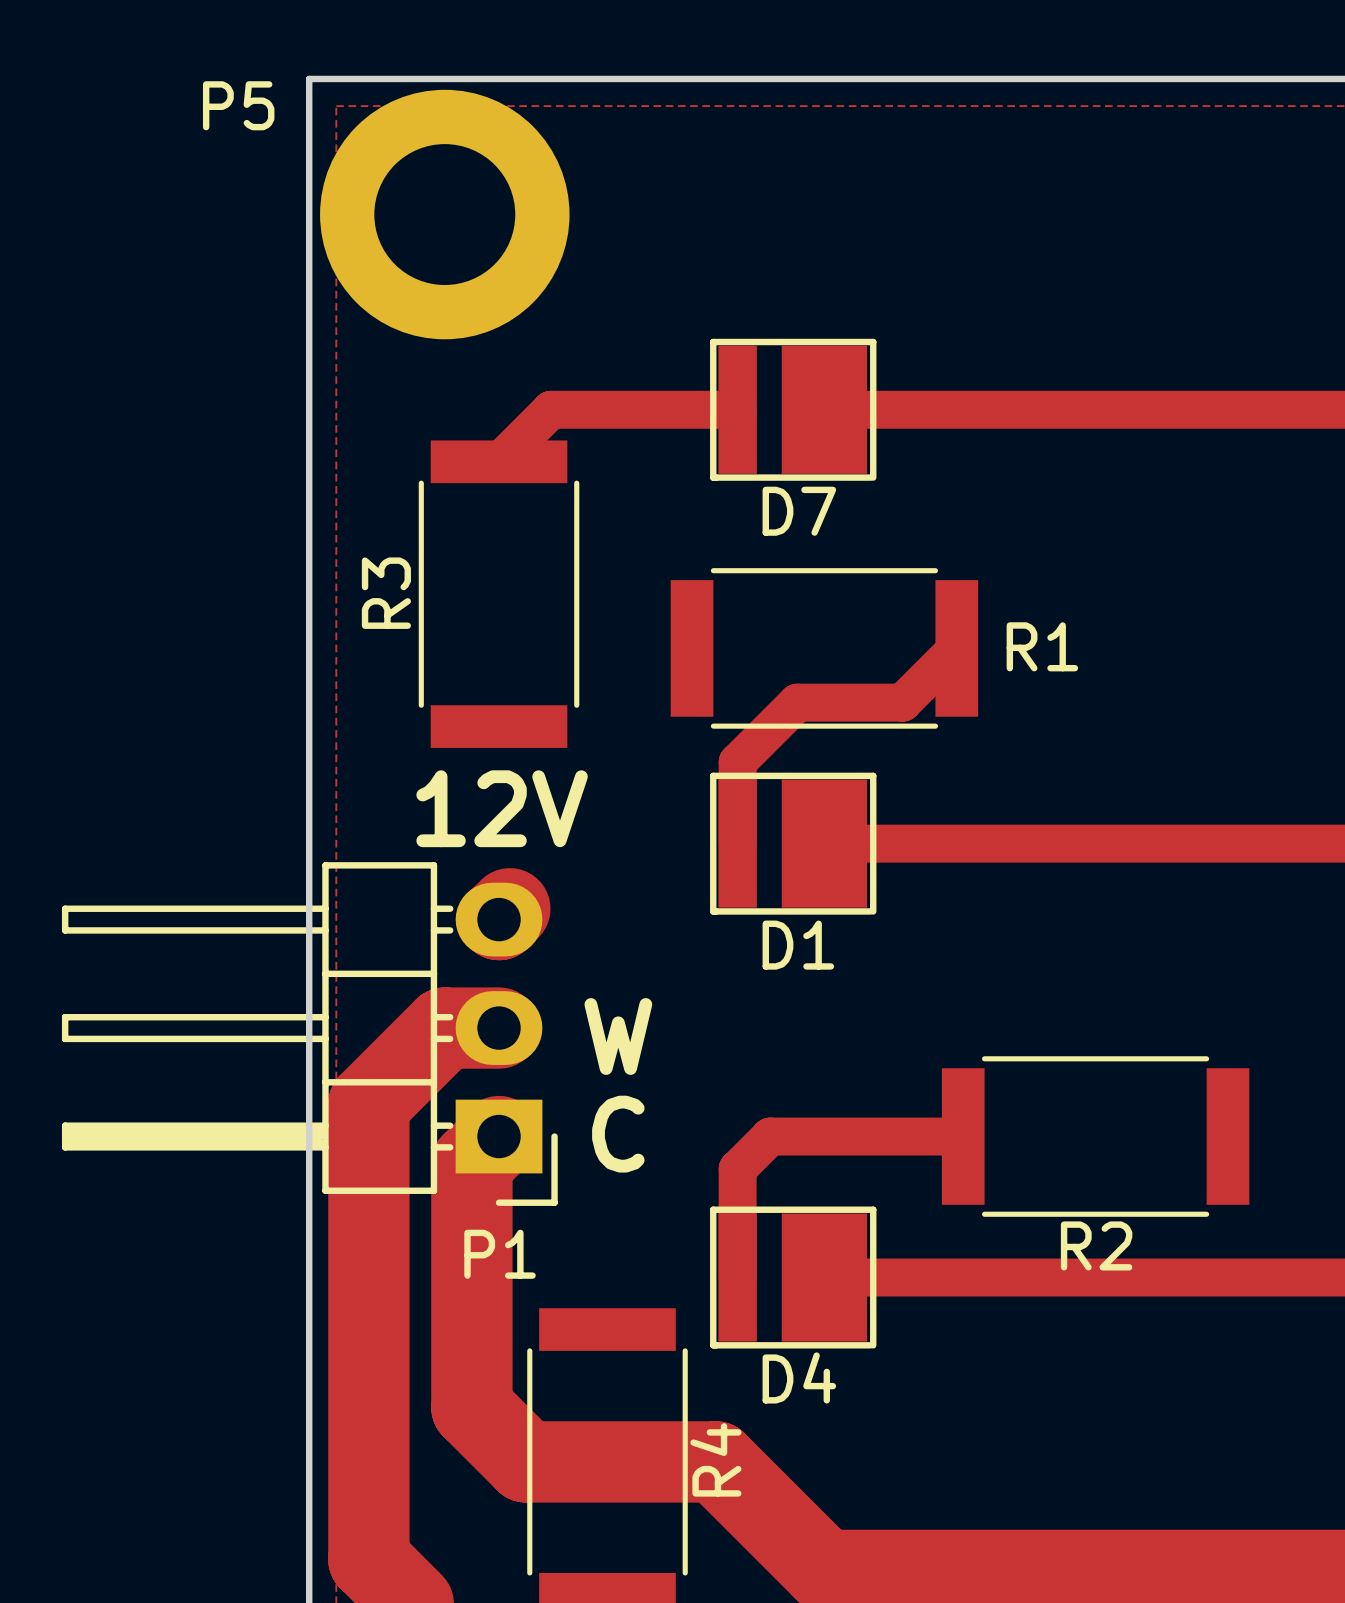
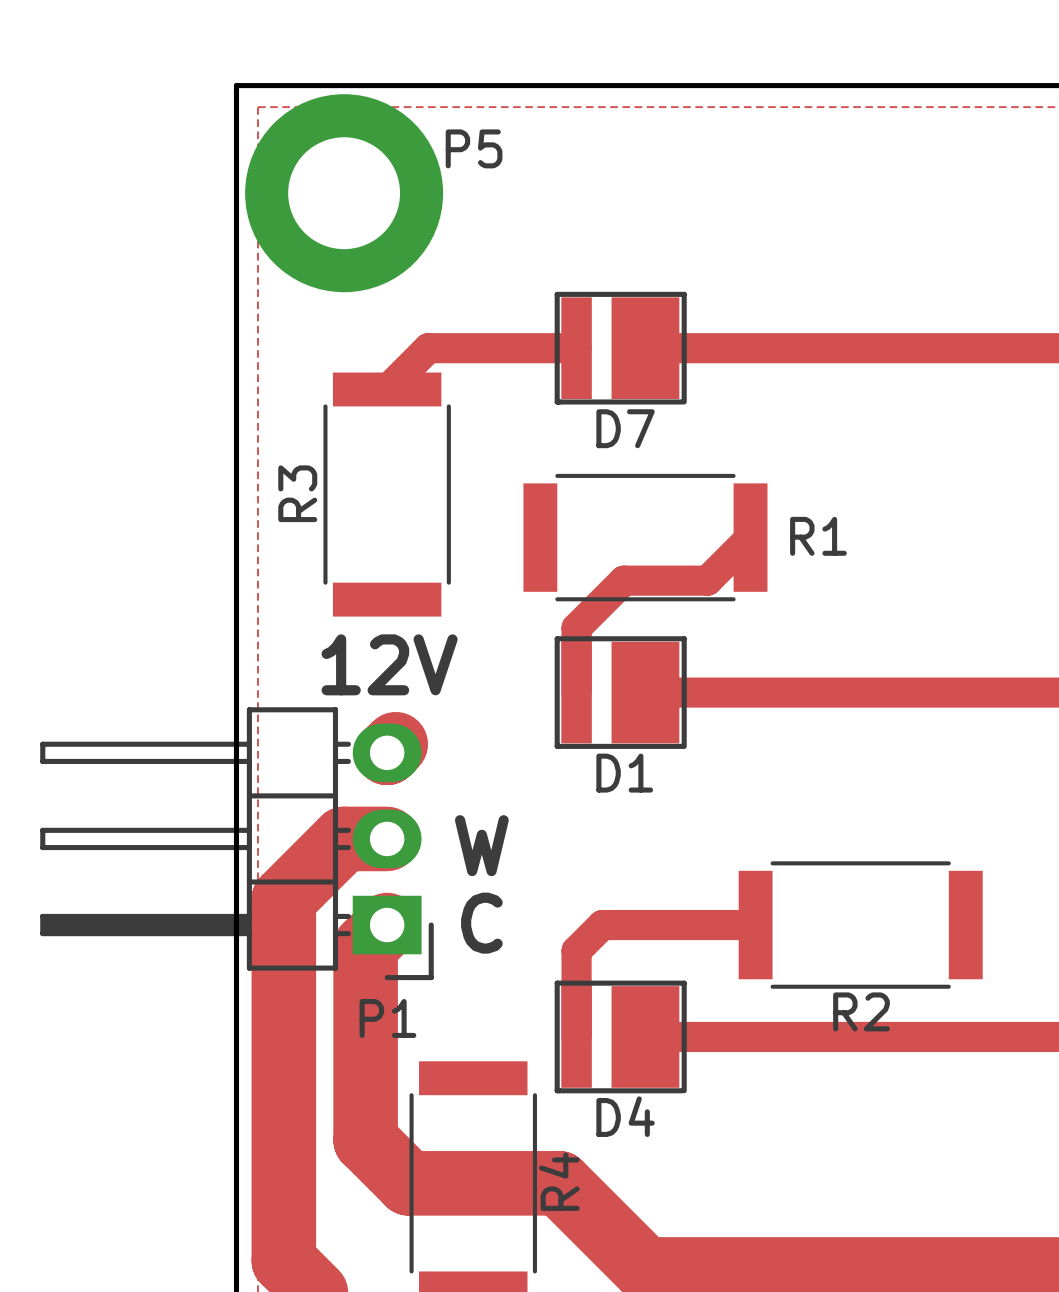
P5 name position: P5 (238, 105) -> P5 (474, 148)

